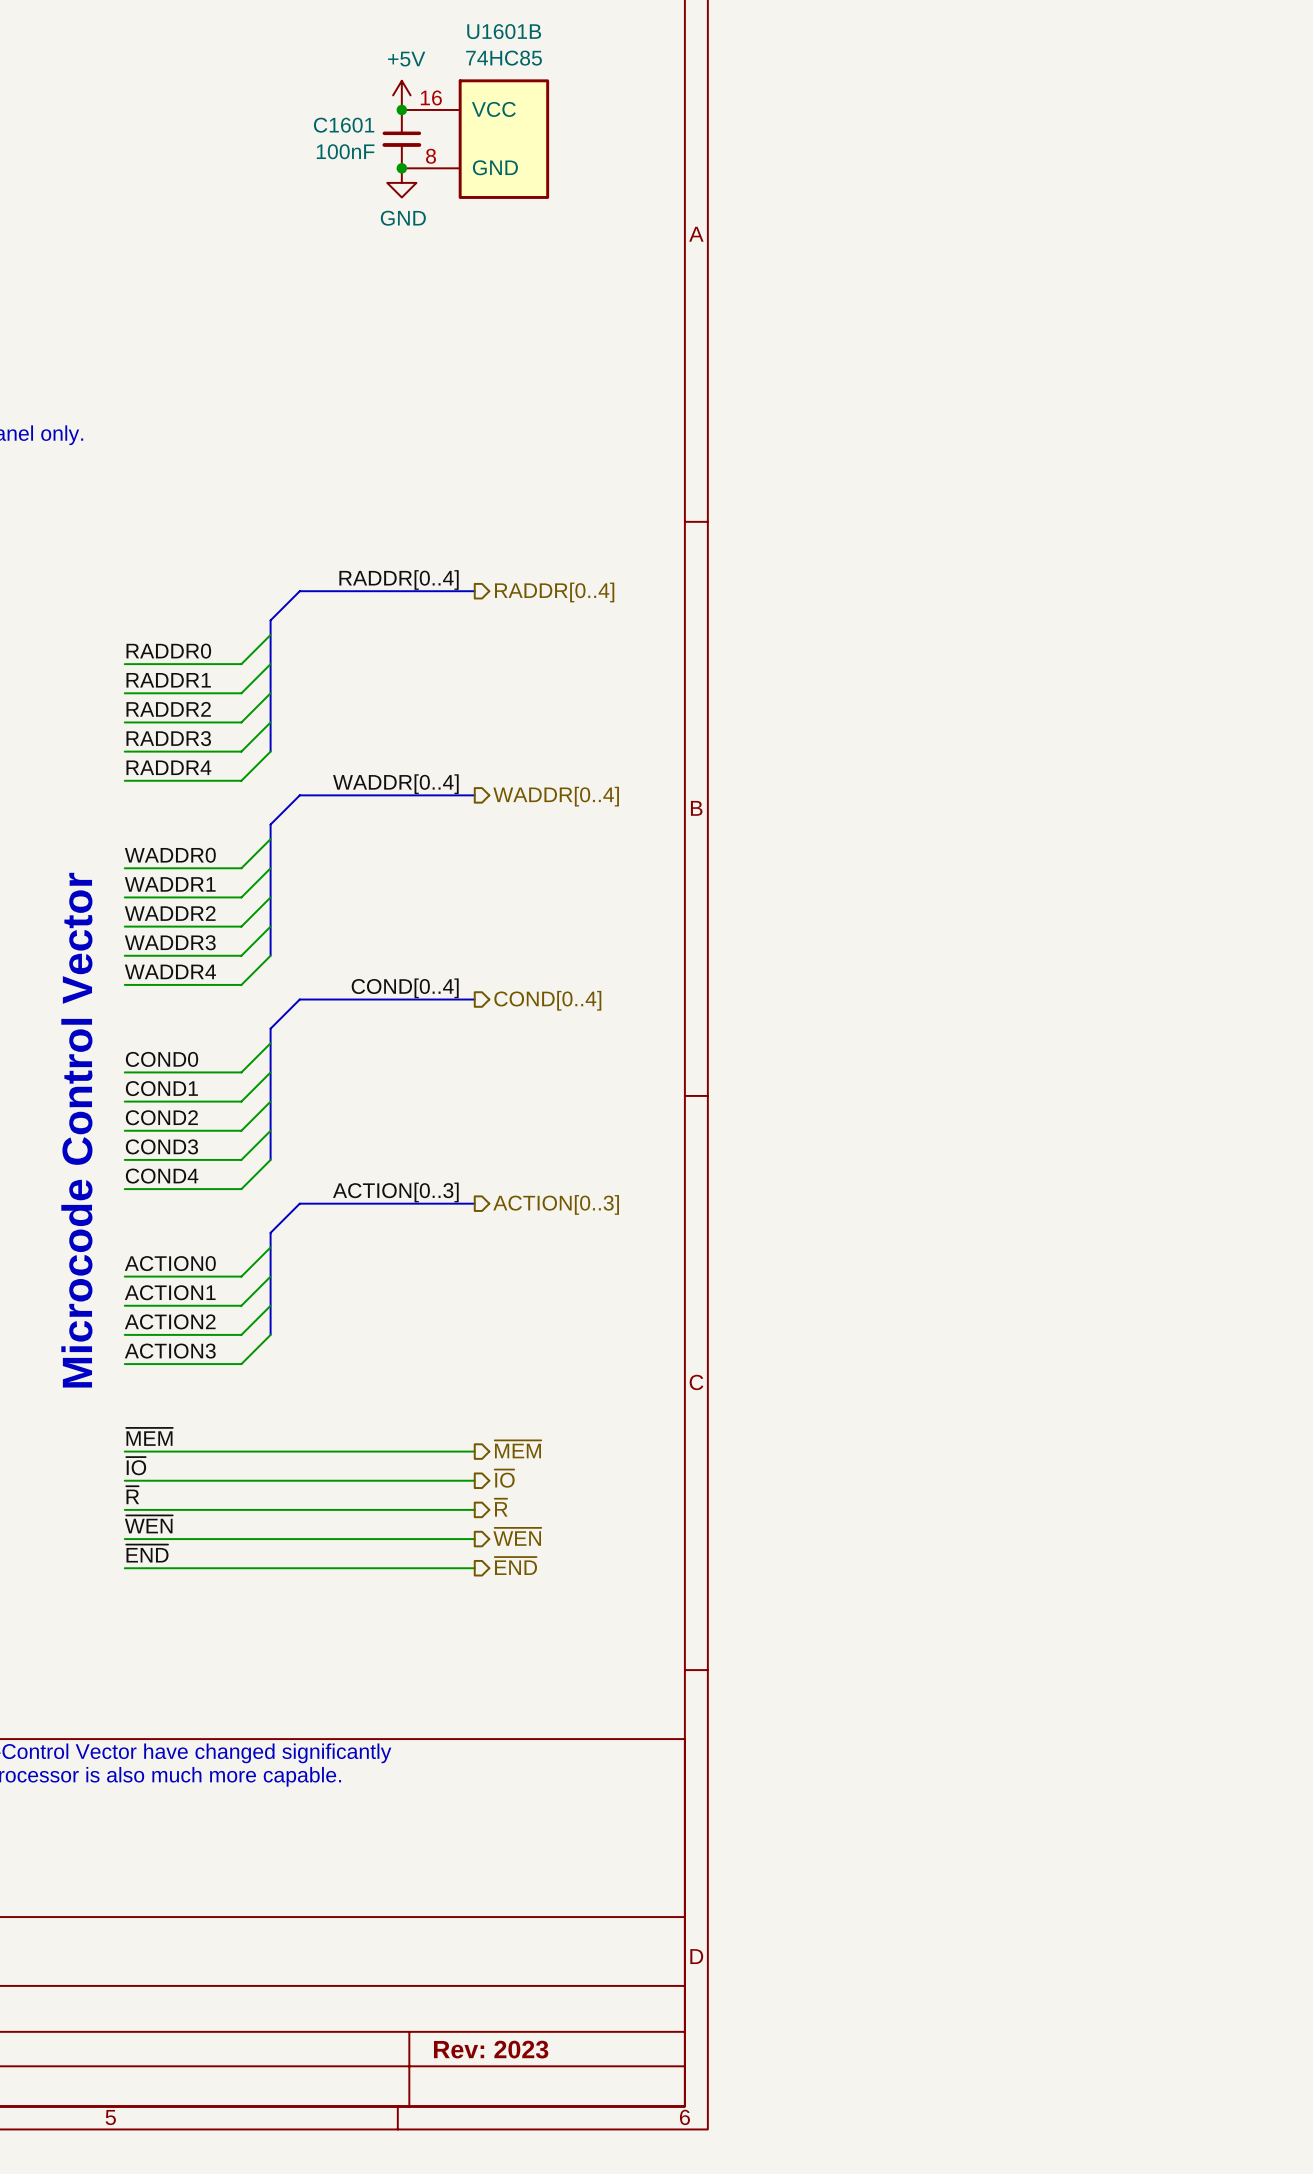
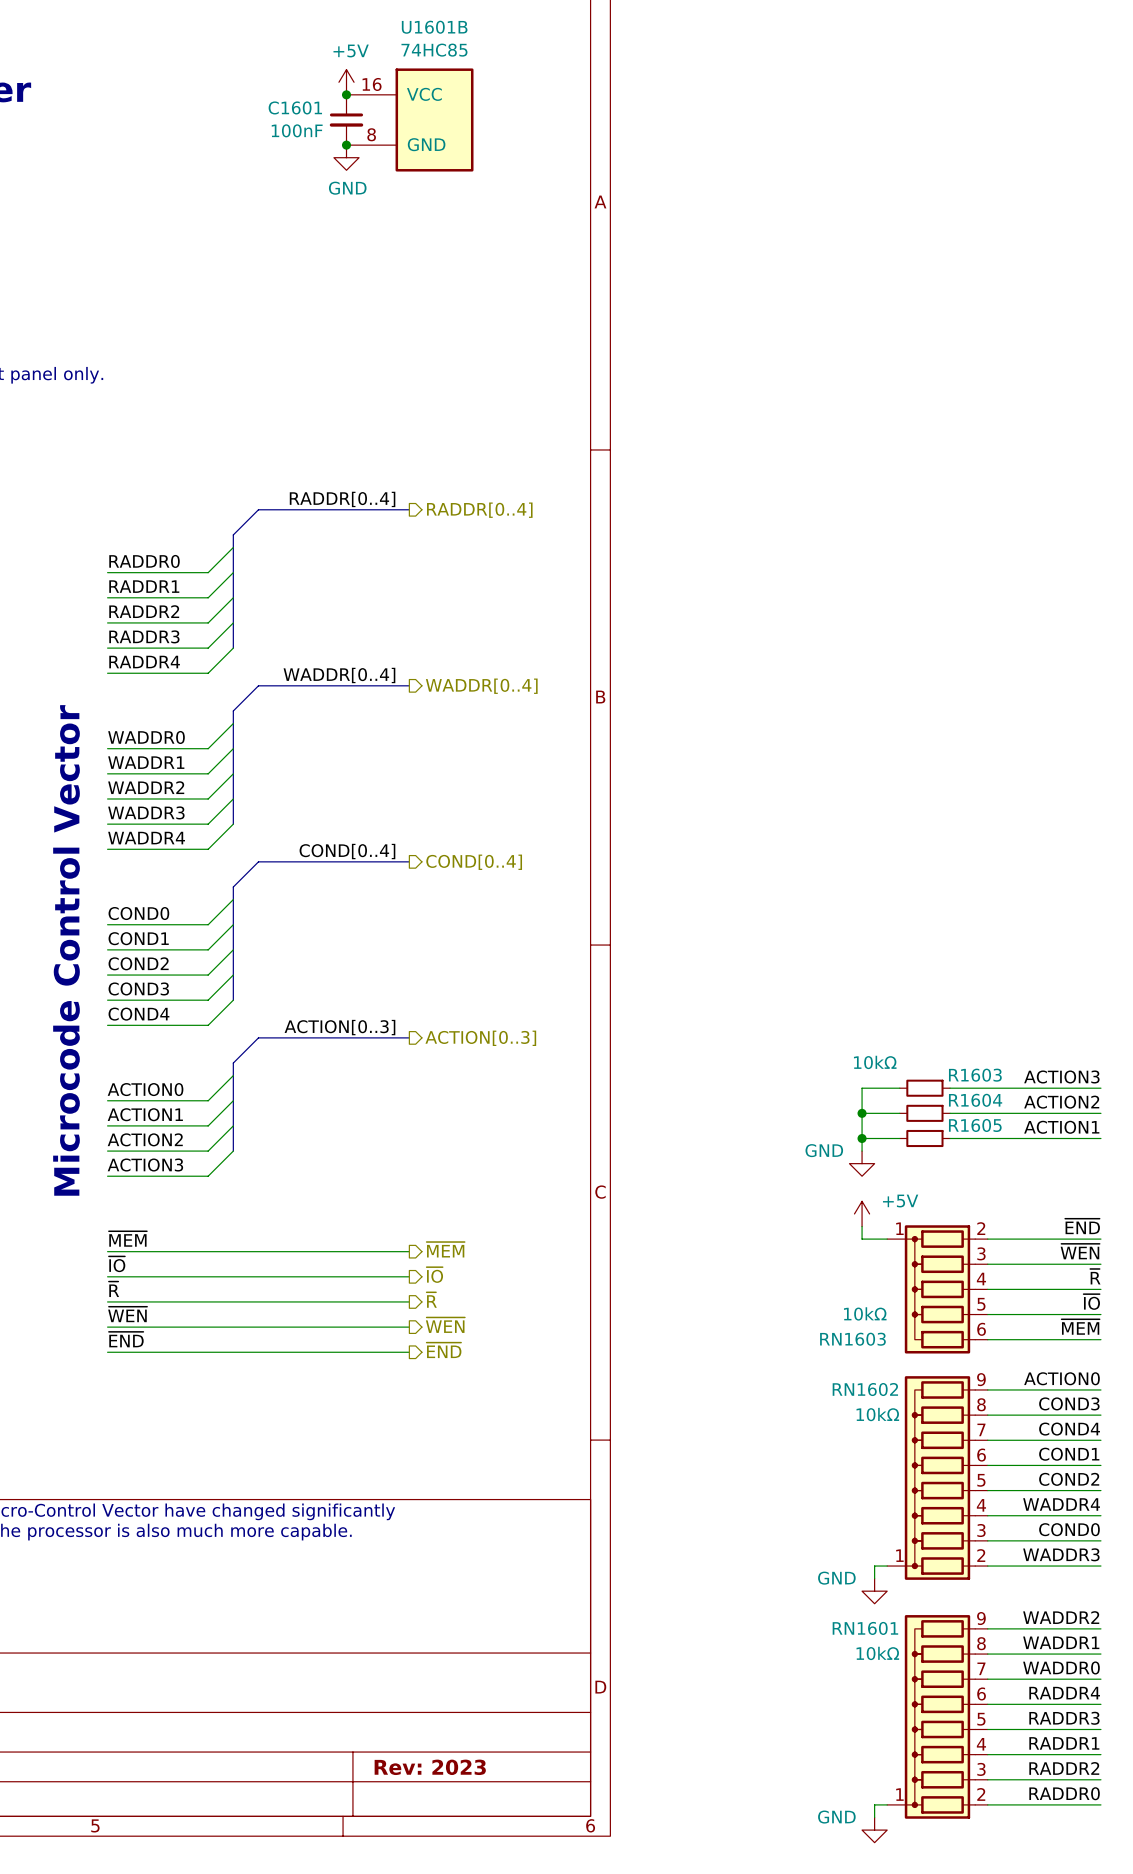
label: none -> ACTION3 (1061, 1076)
wire: none -> (899, 1088) (862, 1088) (862, 1151)
R1603: none -> 10kΩ (924, 1088)
wire: none -> (950, 1088) (1100, 1088)
label: none -> ACTION2 (1061, 1102)
wire: none -> (862, 1113) (899, 1113)
junction: none -> (862, 1113)
R1604: none -> (924, 1113)
wire: none -> (950, 1113) (1100, 1113)
label: none -> ACTION1 (1061, 1127)
wire: none -> (862, 1138) (899, 1138)
junction: none -> (862, 1138)
R1605: none -> (924, 1138)
wire: none -> (950, 1138) (1100, 1138)
power symbol: none -> GND (862, 1163)
power symbol: none -> +5V (862, 1213)
wire: none -> (862, 1226) (862, 1239) (887, 1239)
label: none -> ~{END} (1082, 1226)
wire: none -> (987, 1239) (1100, 1239)
label: none -> ~{WEN} (1080, 1251)
wire: none -> (987, 1264) (1100, 1264)
label: none -> ~{R} (1095, 1276)
RN1603: none -> 10kΩ (937, 1289)
wire: none -> (987, 1289) (1100, 1289)
label: none -> ~{IO} (1091, 1301)
wire: none -> (987, 1314) (1100, 1314)
label: none -> ~{MEM} (1080, 1327)
wire: none -> (987, 1339) (1100, 1339)
label: none -> ACTION0 (1061, 1378)
wire: none -> (987, 1389) (1100, 1389)
label: none -> COND3 (1069, 1403)
wire: none -> (987, 1415) (1100, 1415)
label: none -> COND4 (1069, 1429)
wire: none -> (987, 1440) (1100, 1440)
label: none -> COND1 (1069, 1454)
wire: none -> (987, 1465) (1100, 1465)
RN1602: none -> 10kΩ (937, 1478)
label: none -> COND2 (1069, 1479)
wire: none -> (987, 1490) (1100, 1490)
label: none -> WADDR4 (1061, 1504)
wire: none -> (987, 1515) (1100, 1515)
label: none -> COND0 (1069, 1529)
wire: none -> (987, 1540) (1100, 1540)
label: none -> WADDR3 (1061, 1554)
wire: none -> (887, 1566) (874, 1566) (874, 1578)
wire: none -> (987, 1566) (1100, 1566)
power symbol: none -> GND (874, 1591)
label: none -> WADDR2 (1061, 1617)
wire: none -> (987, 1628) (1100, 1628)
label: none -> WADDR1 (1061, 1642)
wire: none -> (987, 1654) (1100, 1654)
label: none -> WADDR0 (1061, 1667)
wire: none -> (987, 1679) (1100, 1679)
label: none -> RADDR4 (1064, 1693)
wire: none -> (987, 1704) (1100, 1704)
RN1601: none -> 10kΩ (937, 1716)
label: none -> RADDR3 (1064, 1718)
wire: none -> (987, 1729) (1100, 1729)
label: none -> RADDR1 (1064, 1743)
wire: none -> (987, 1754) (1100, 1754)
label: none -> RADDR2 (1064, 1768)
wire: none -> (987, 1779) (1100, 1779)
label: none -> RADDR0 (1064, 1793)
wire: none -> (887, 1804) (874, 1804) (874, 1817)
wire: none -> (987, 1804) (1100, 1804)
power symbol: none -> GND (874, 1830)

